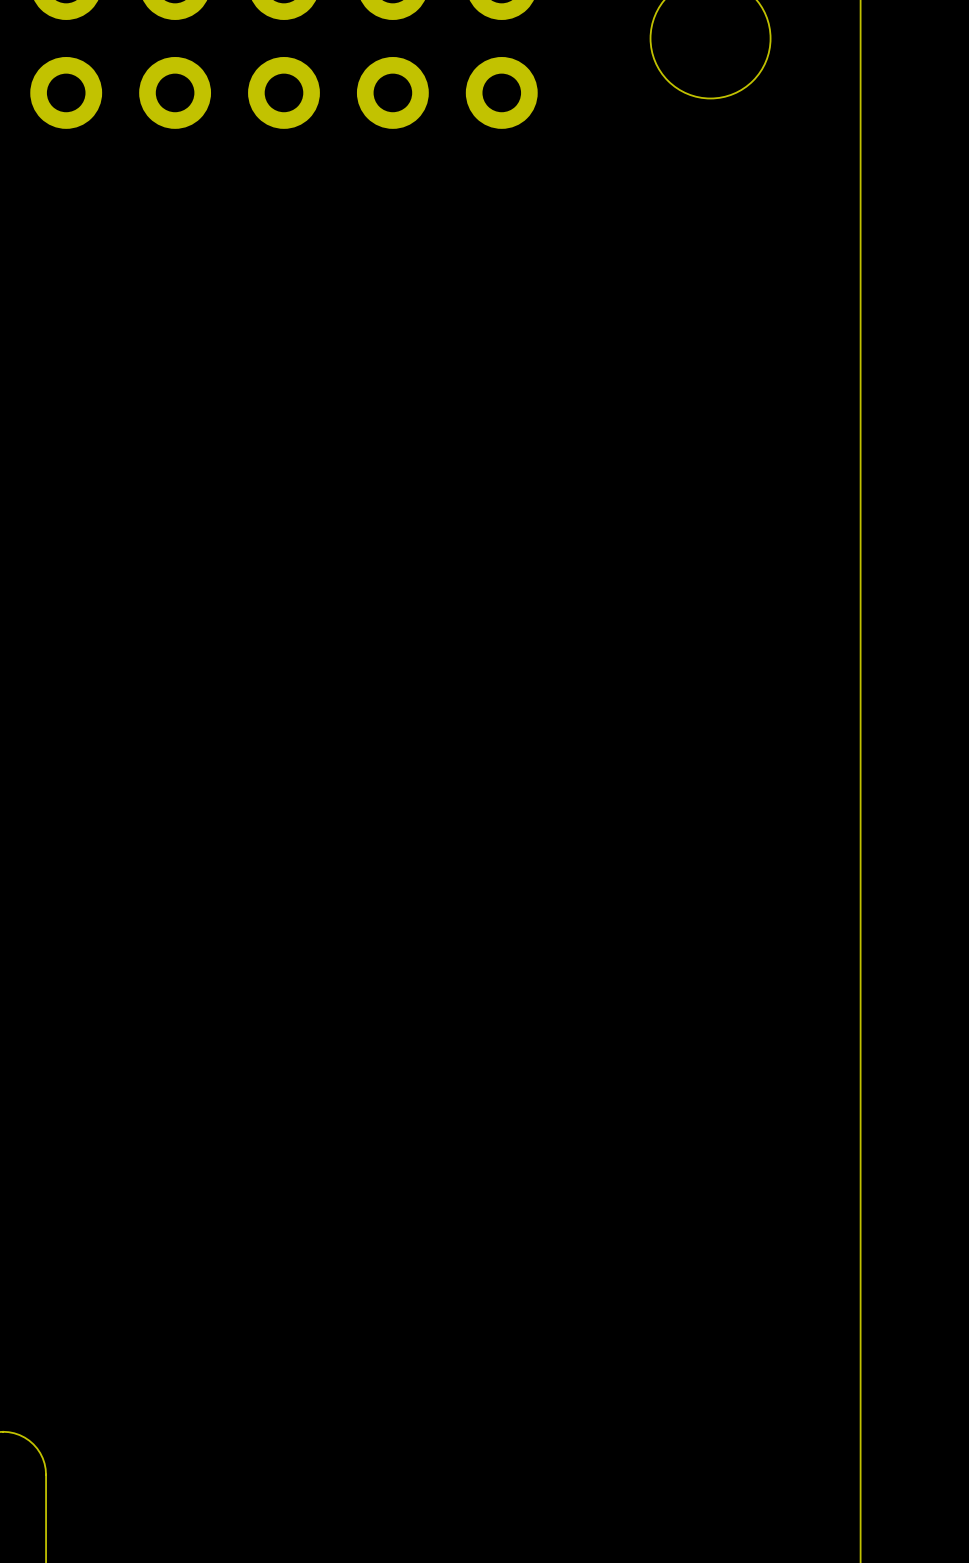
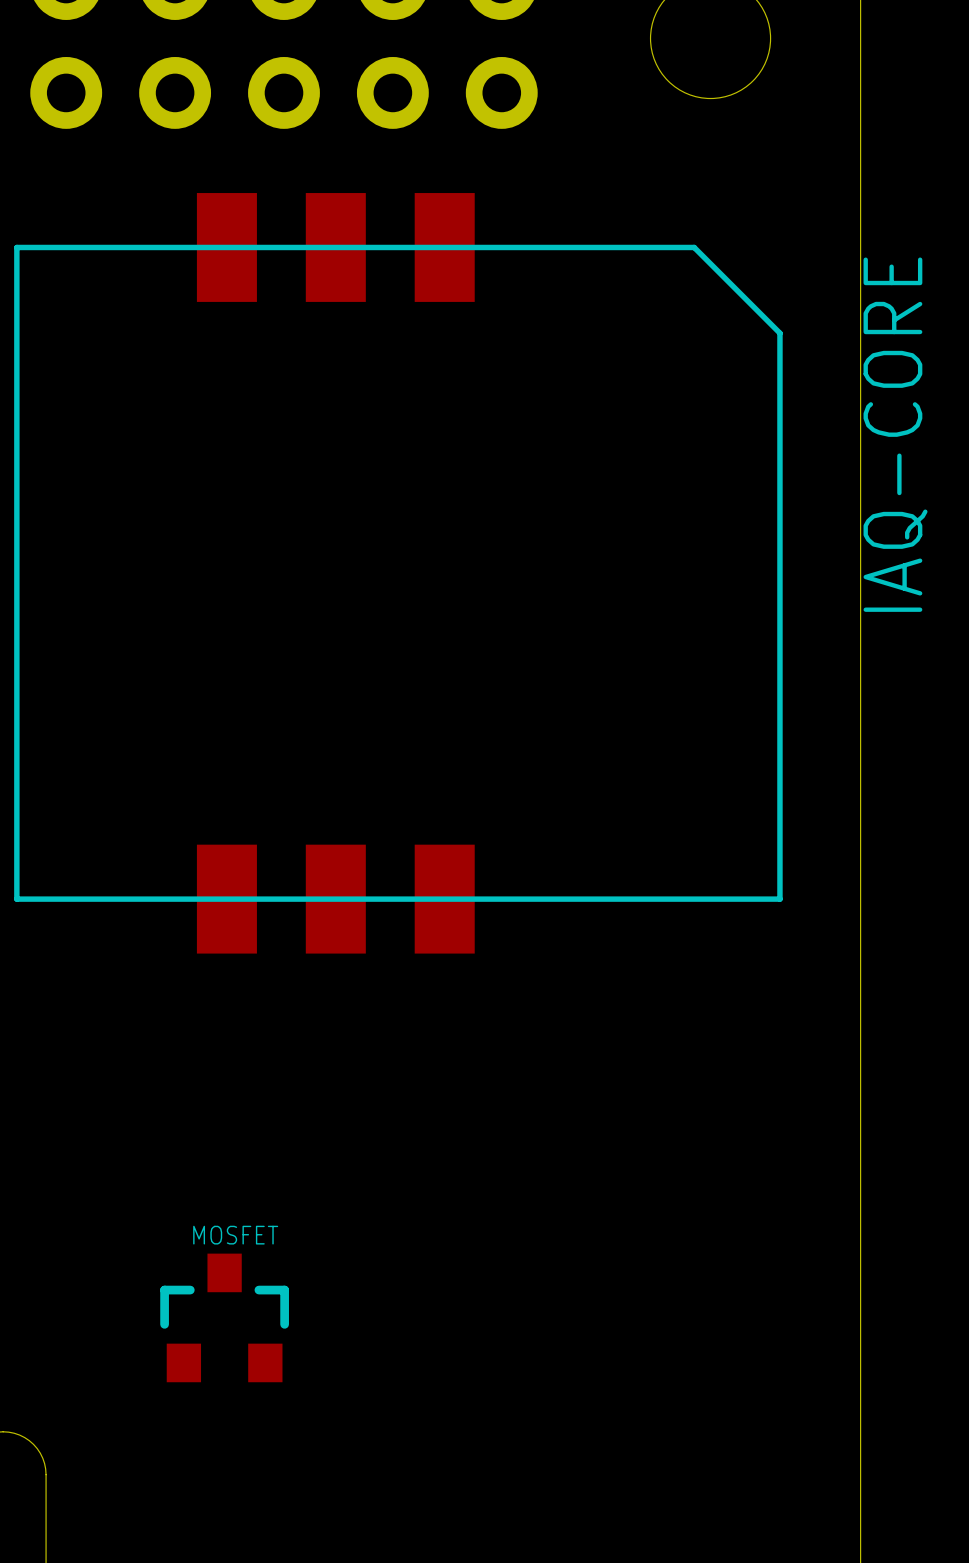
IAQ-CORE: none -> (398, 573)
MOSFET: none -> (224, 1317)

